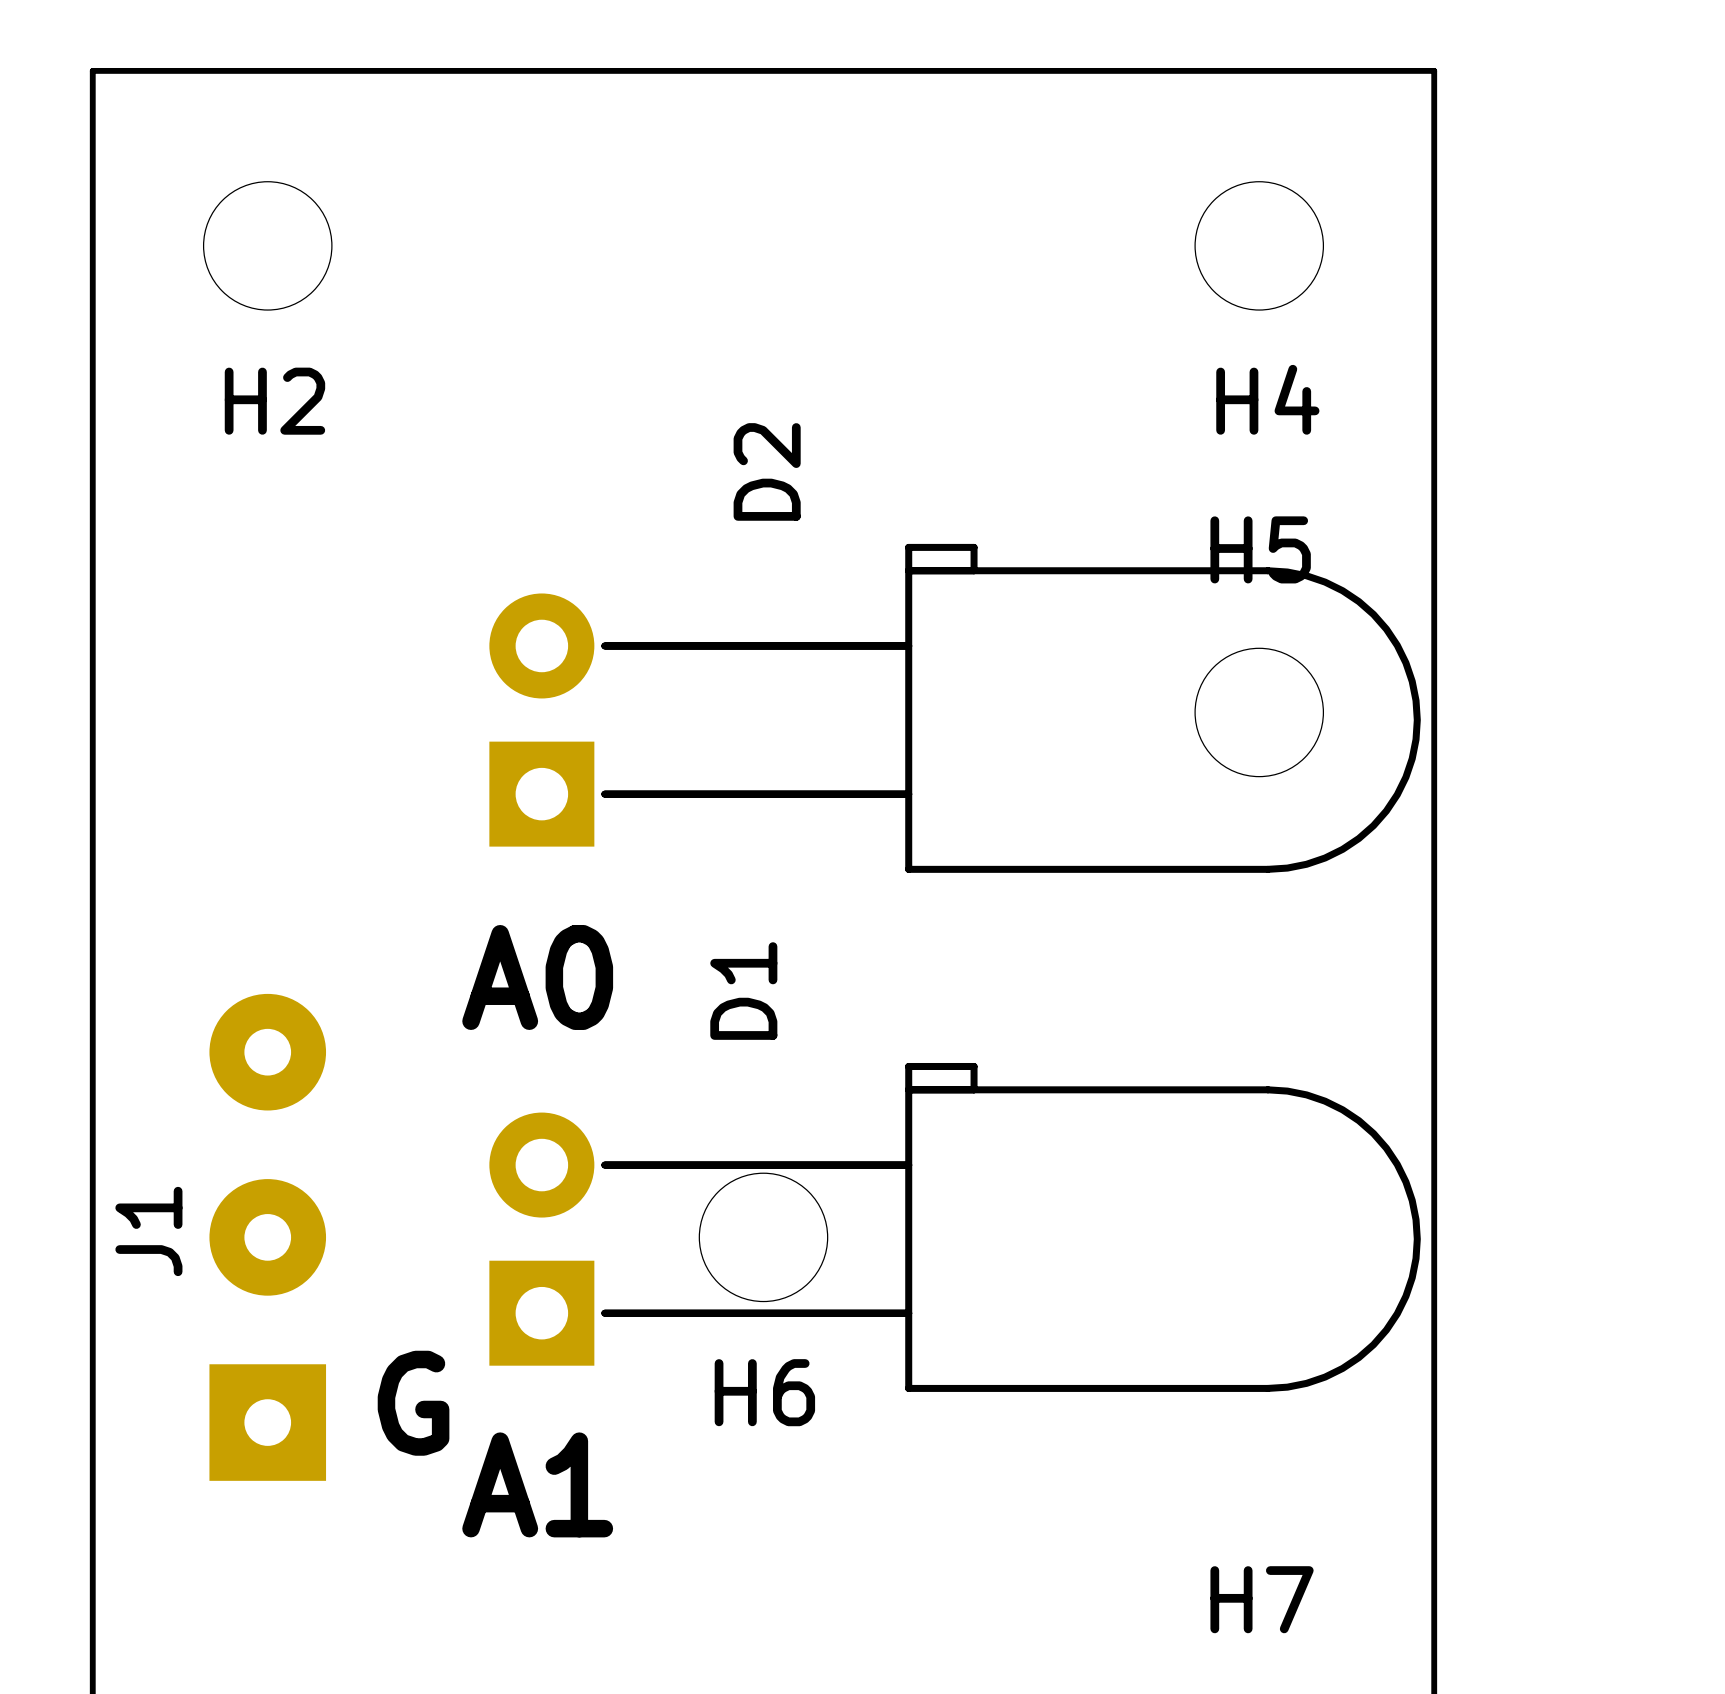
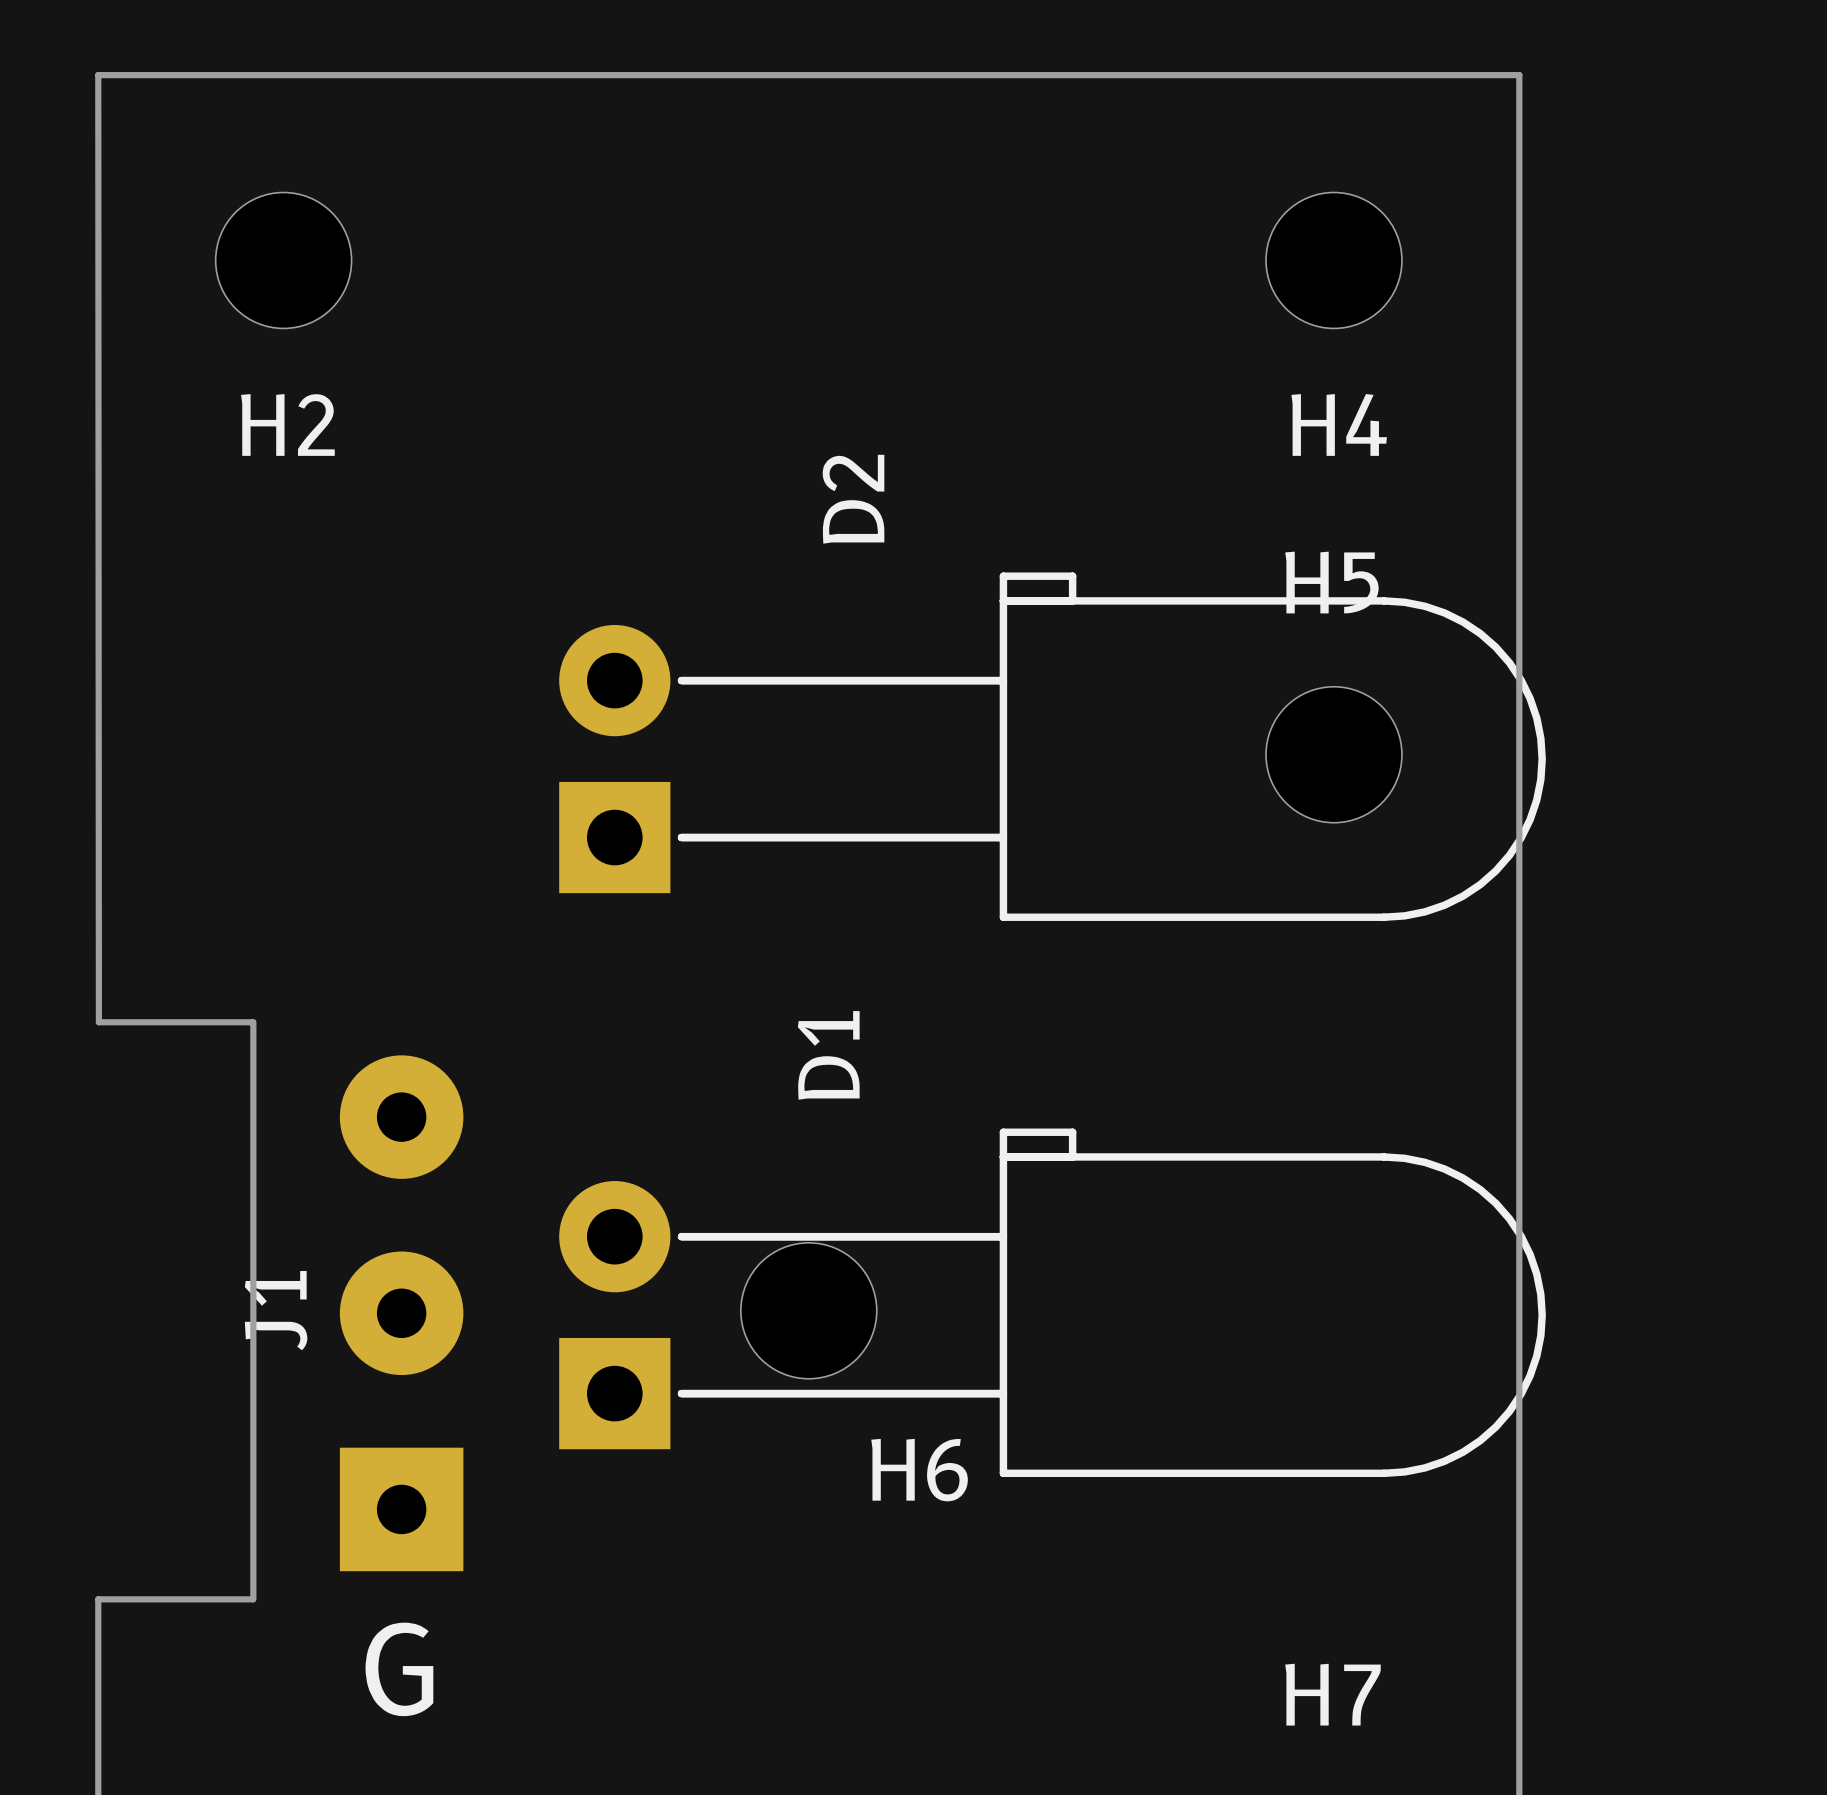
board edge: (92, 70) (92, 1509) -> (98, 75) (98, 1022) (252, 1022)
D2 position: (955, 708) -> (1052, 746)
board edge: none -> (253, 1022) (253, 1599)
text: A0 (537, 977) -> none
D1 position: (955, 1227) -> (1052, 1302)
J1 position: (267, 1237) -> (401, 1313)
H6 name position: H6 (764, 1392) -> H6 (919, 1470)
text position: G (413, 1403) -> G (399, 1669)
text: A1 (537, 1484) -> none
board edge: none -> (98, 1599) (252, 1599)

